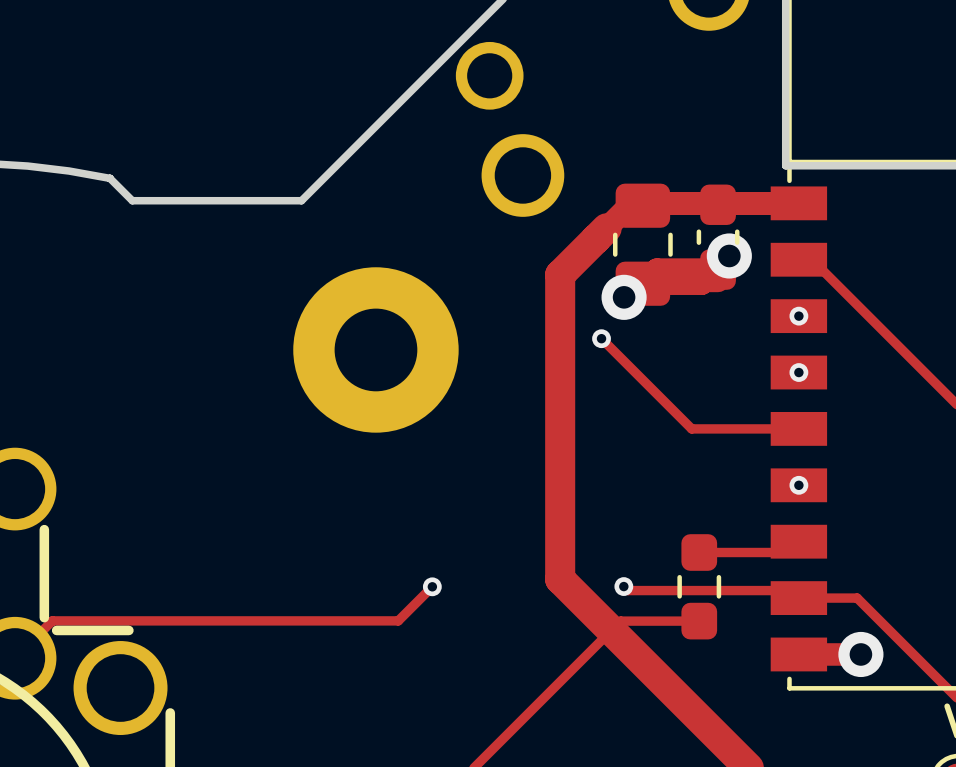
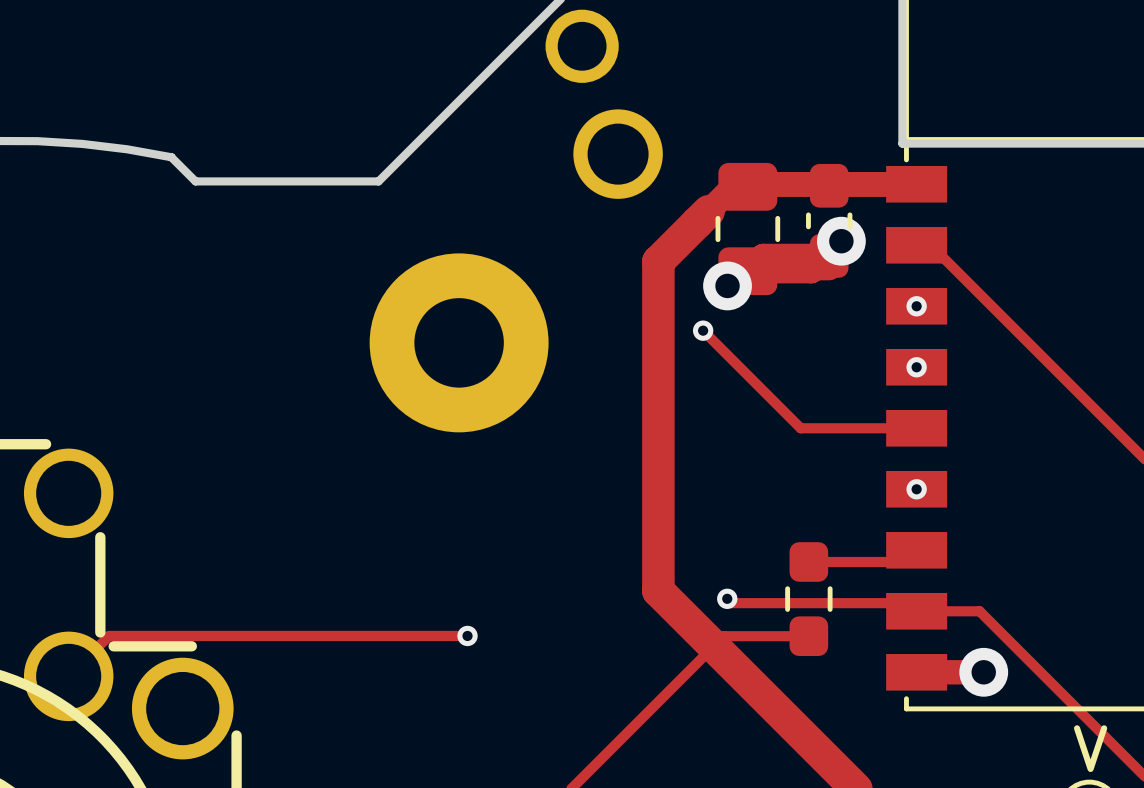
track: (432, 586) (398, 620) (383, 620) -> none
via position: (432, 586) -> (467, 635)

